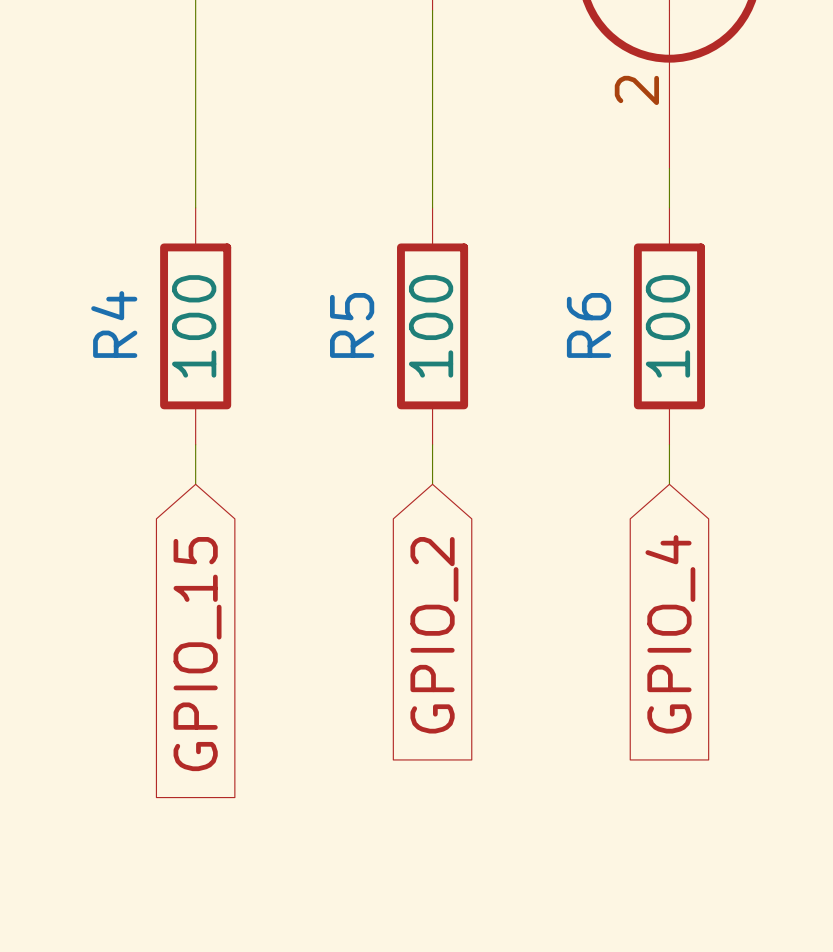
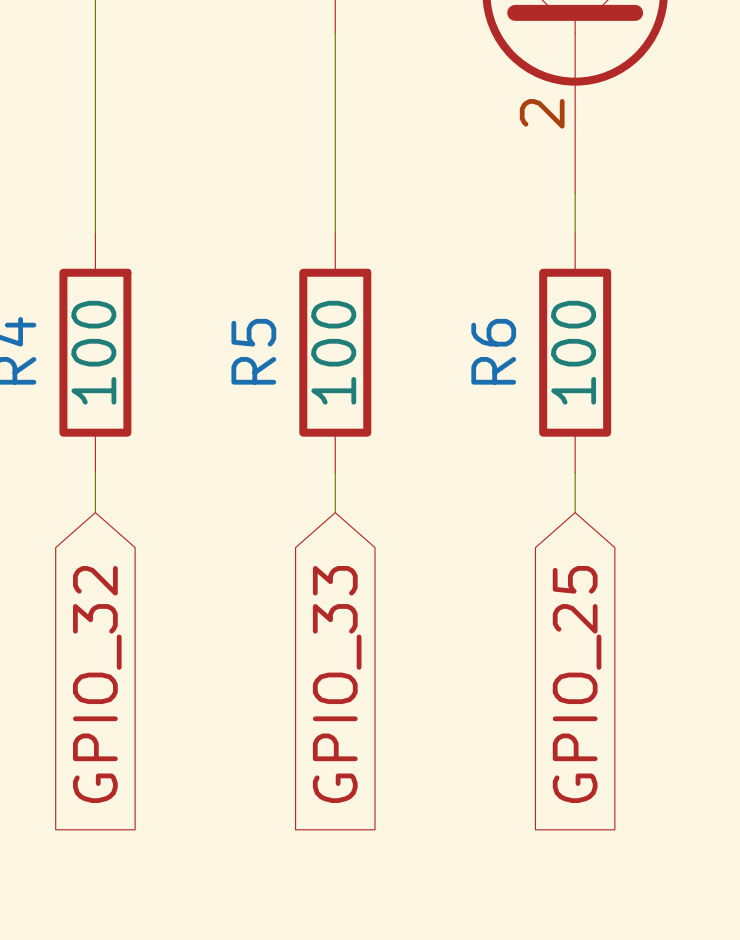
global label: GPIO_4 (670, 634) -> GPIO_25 (577, 684)
global label: GPIO_2 (434, 635) -> GPIO_33 (337, 684)
global label: GPIO_15 (197, 654) -> GPIO_32 (97, 684)

